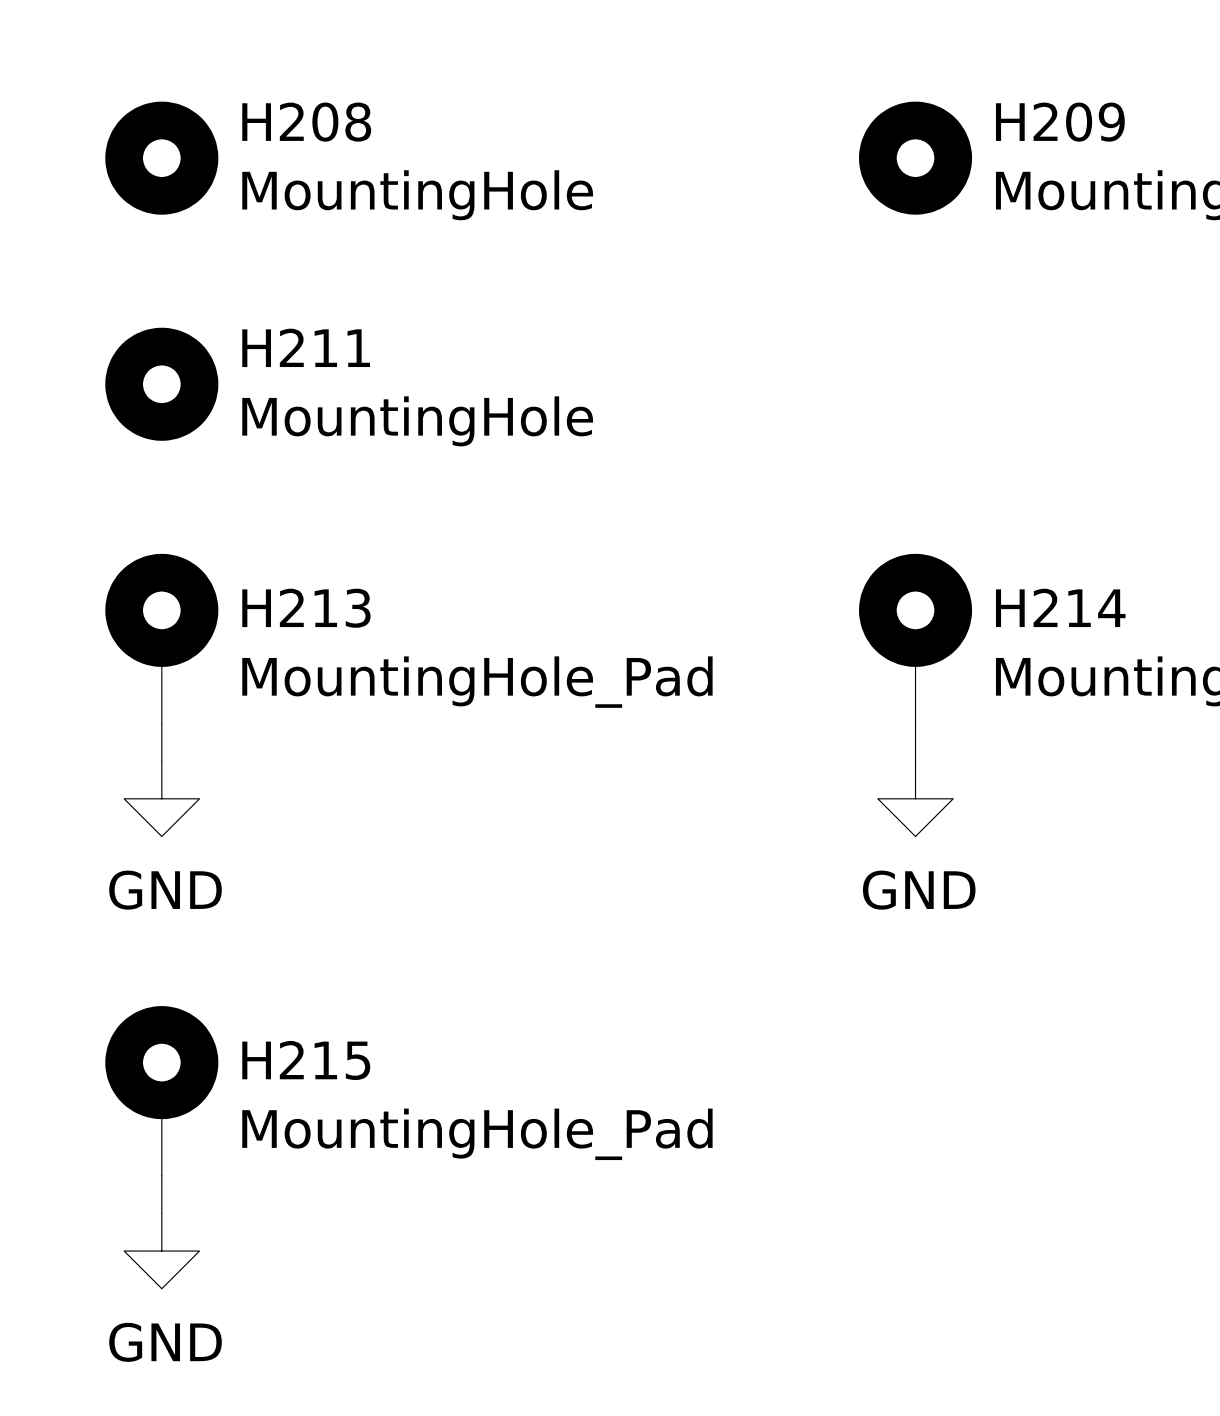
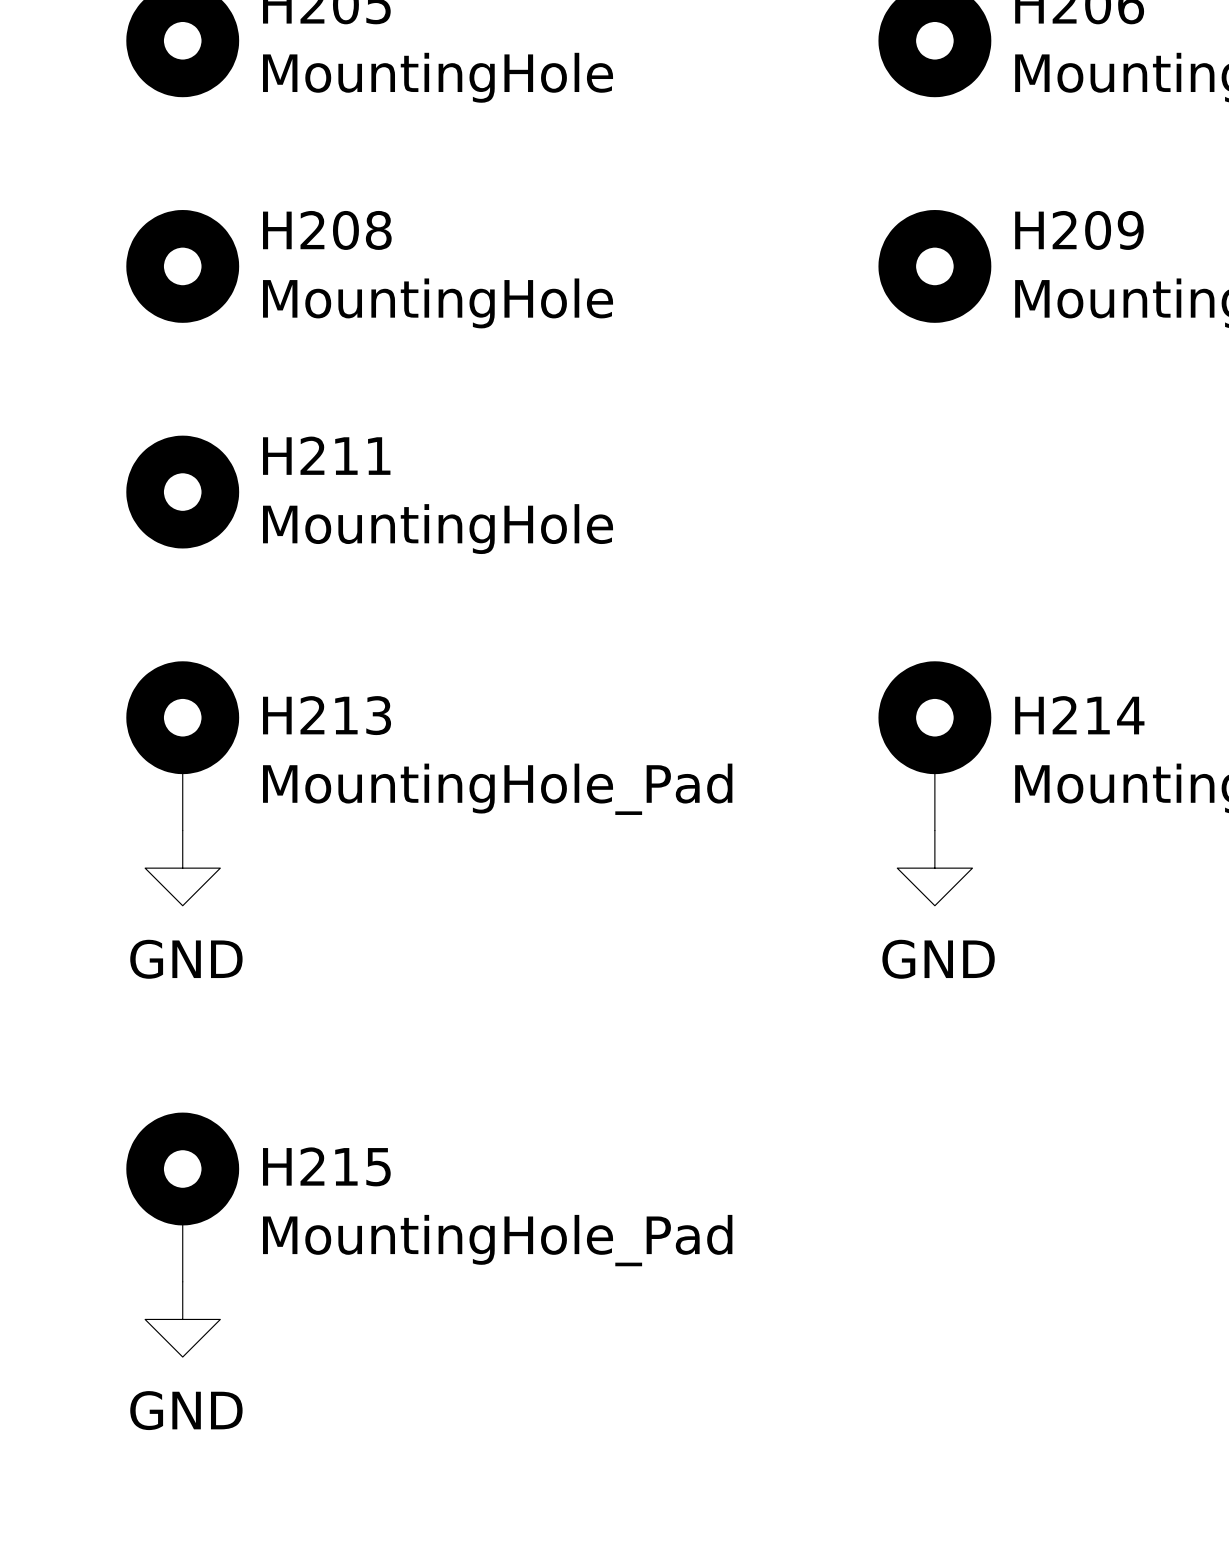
power symbol position: GND (161, 798) -> GND (182, 868)
power symbol position: GND (915, 798) -> GND (934, 868)
power symbol position: GND (161, 1251) -> GND (182, 1319)

